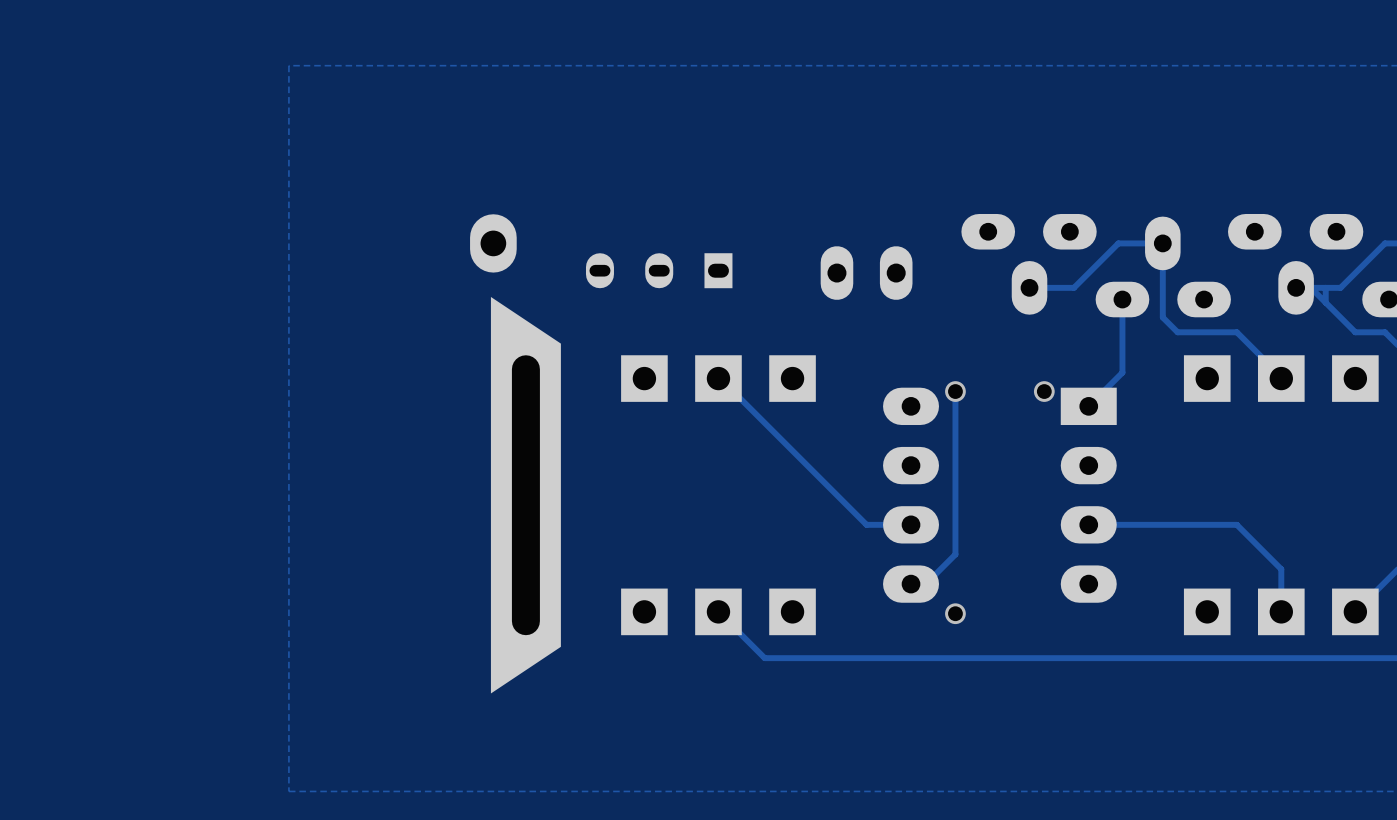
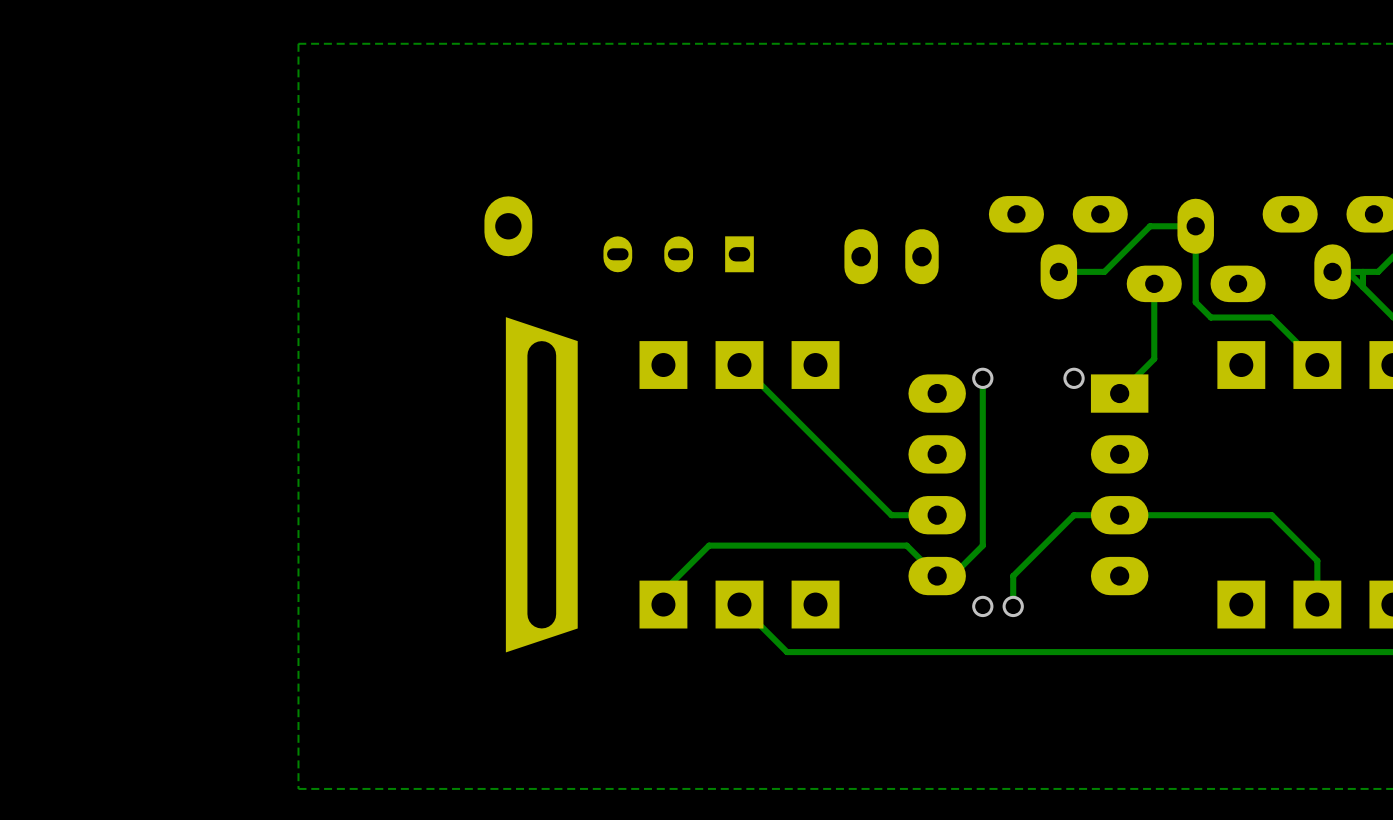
part footprint: [490, 296, 561, 694] -> [505, 317, 578, 653]
track: none -> (1119, 515) (1074, 515) (1013, 576) (1013, 606)
track: none -> (937, 576) (906, 545) (709, 545) (663, 591) (663, 604)
via: none -> (1013, 606)

